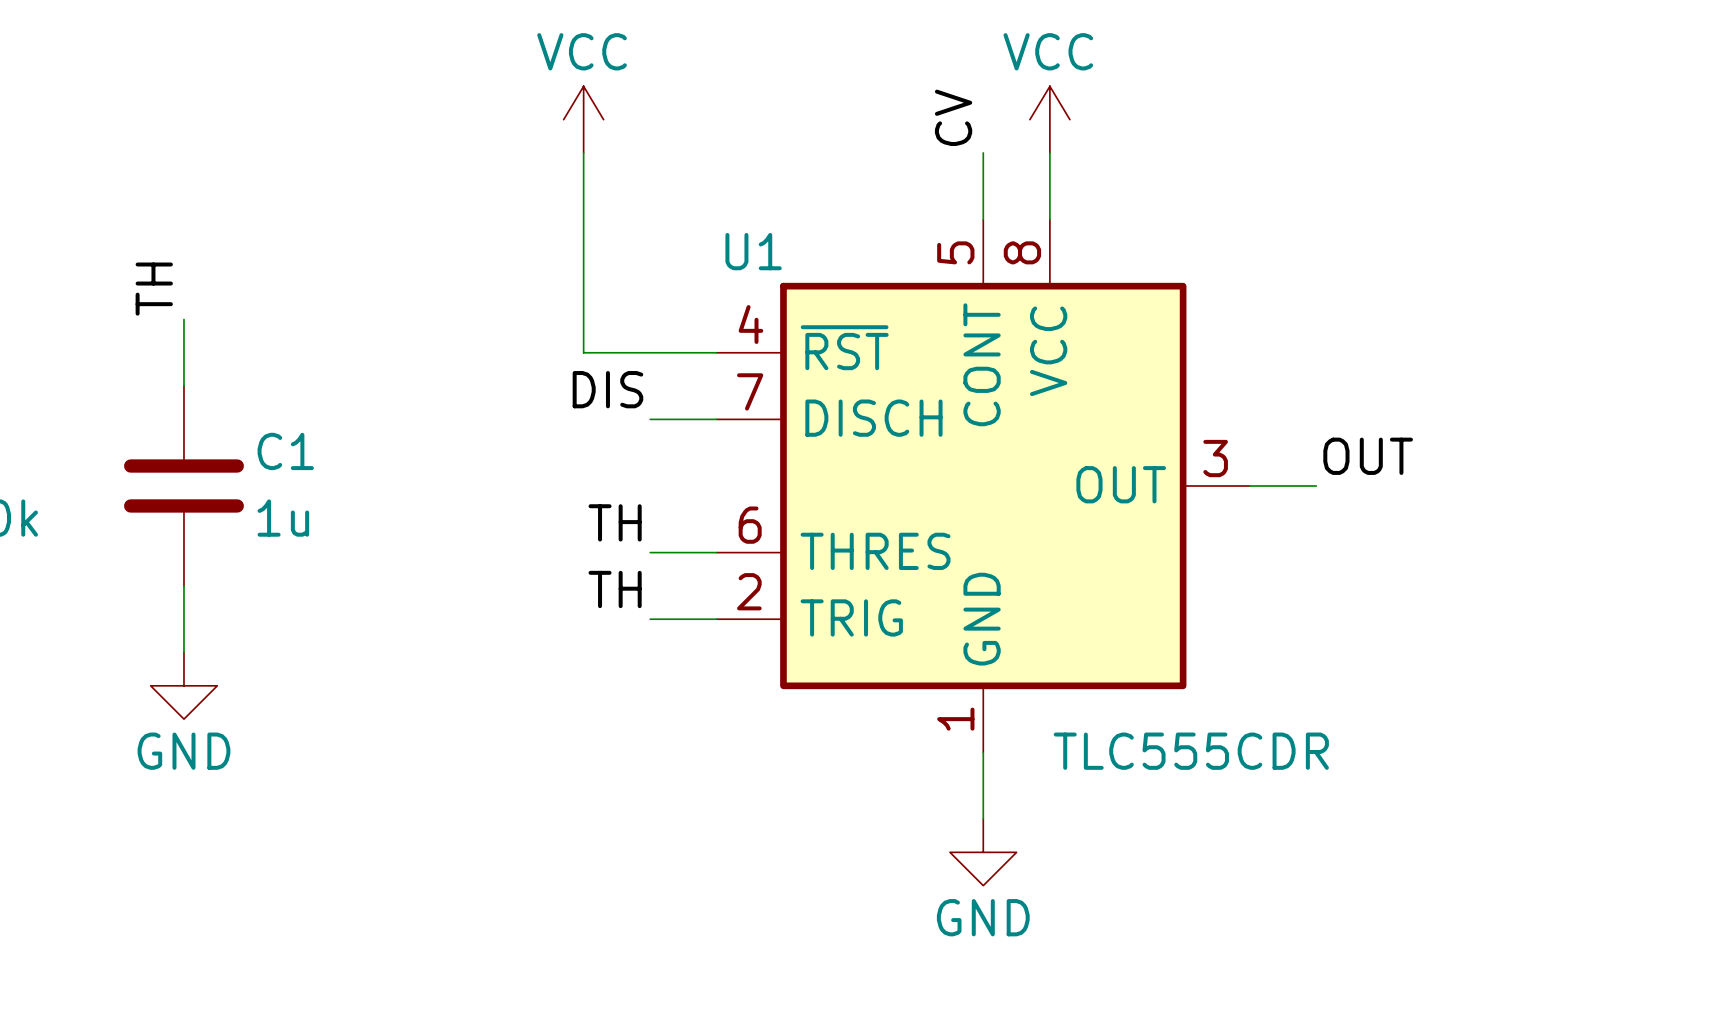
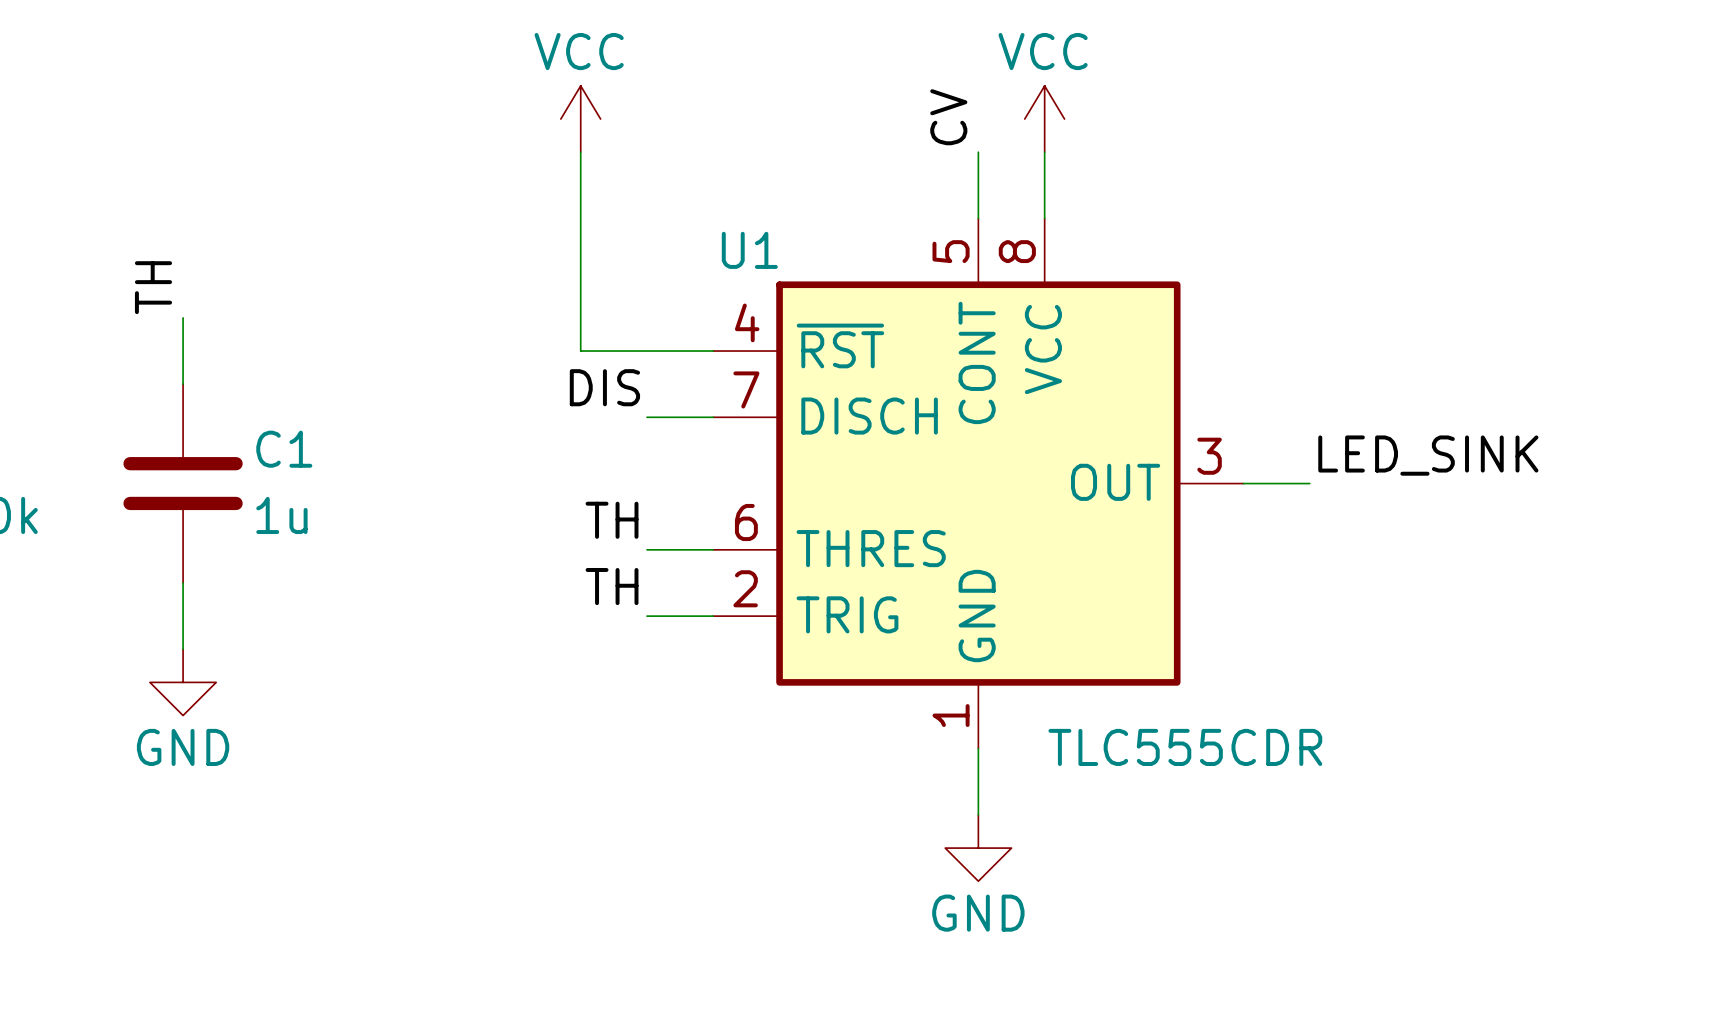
label: OUT (1368, 456) -> LED_SINK (1428, 455)

